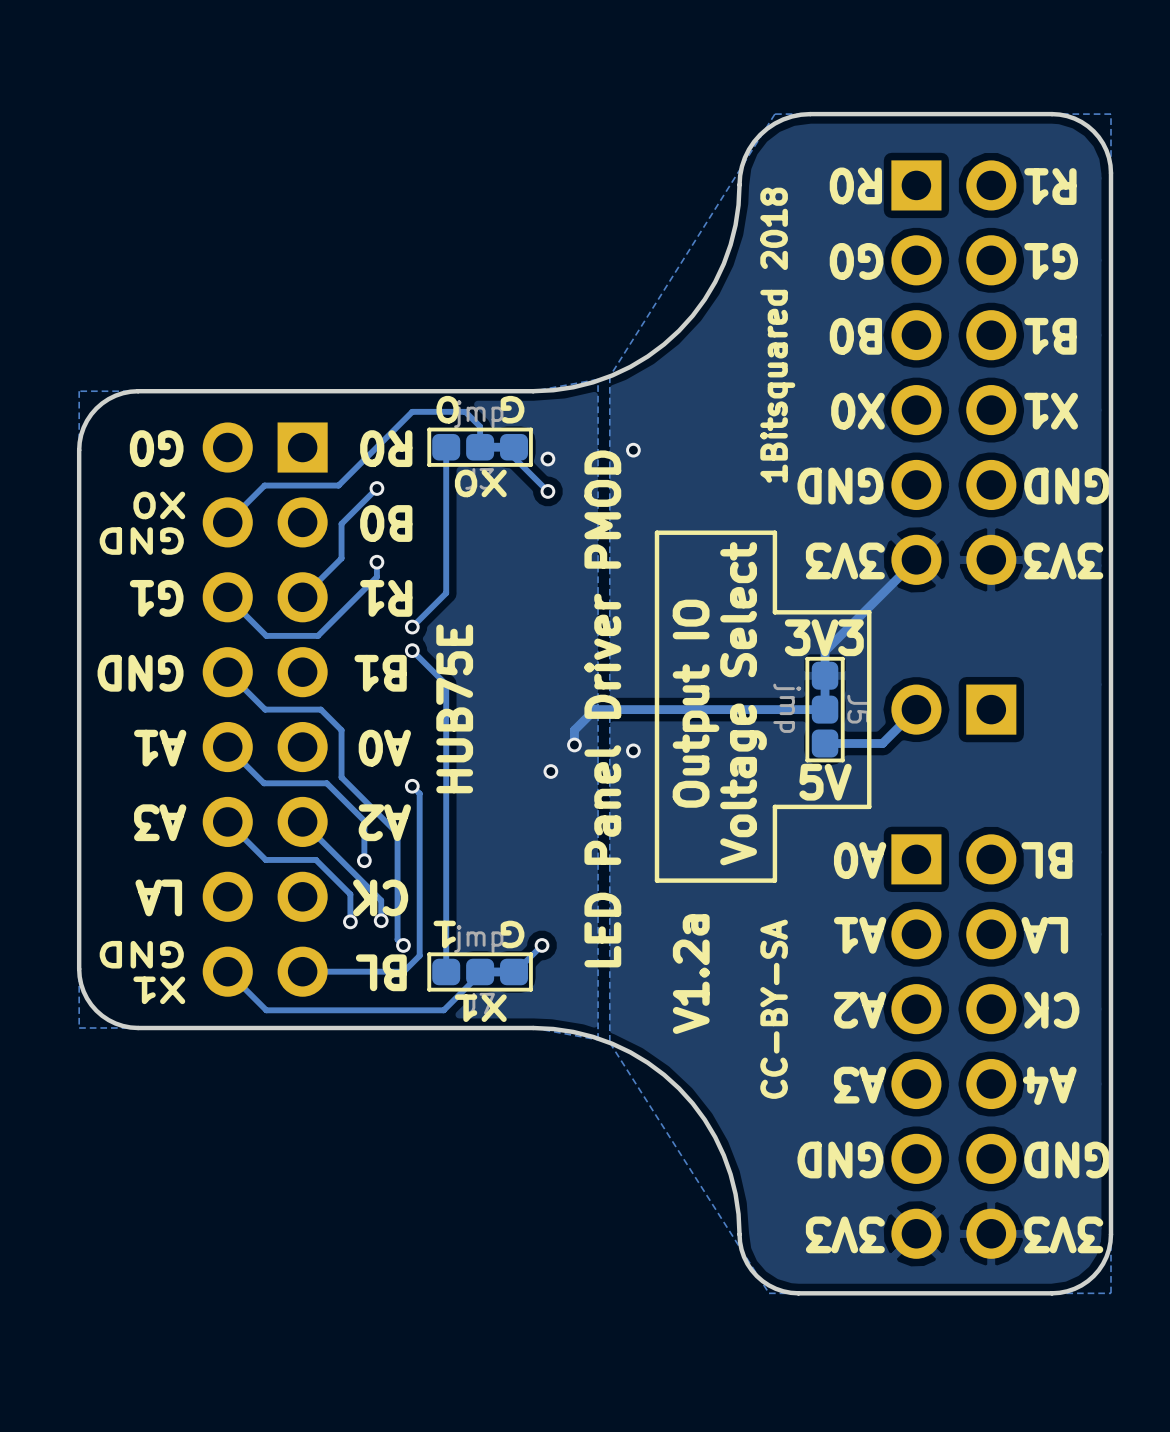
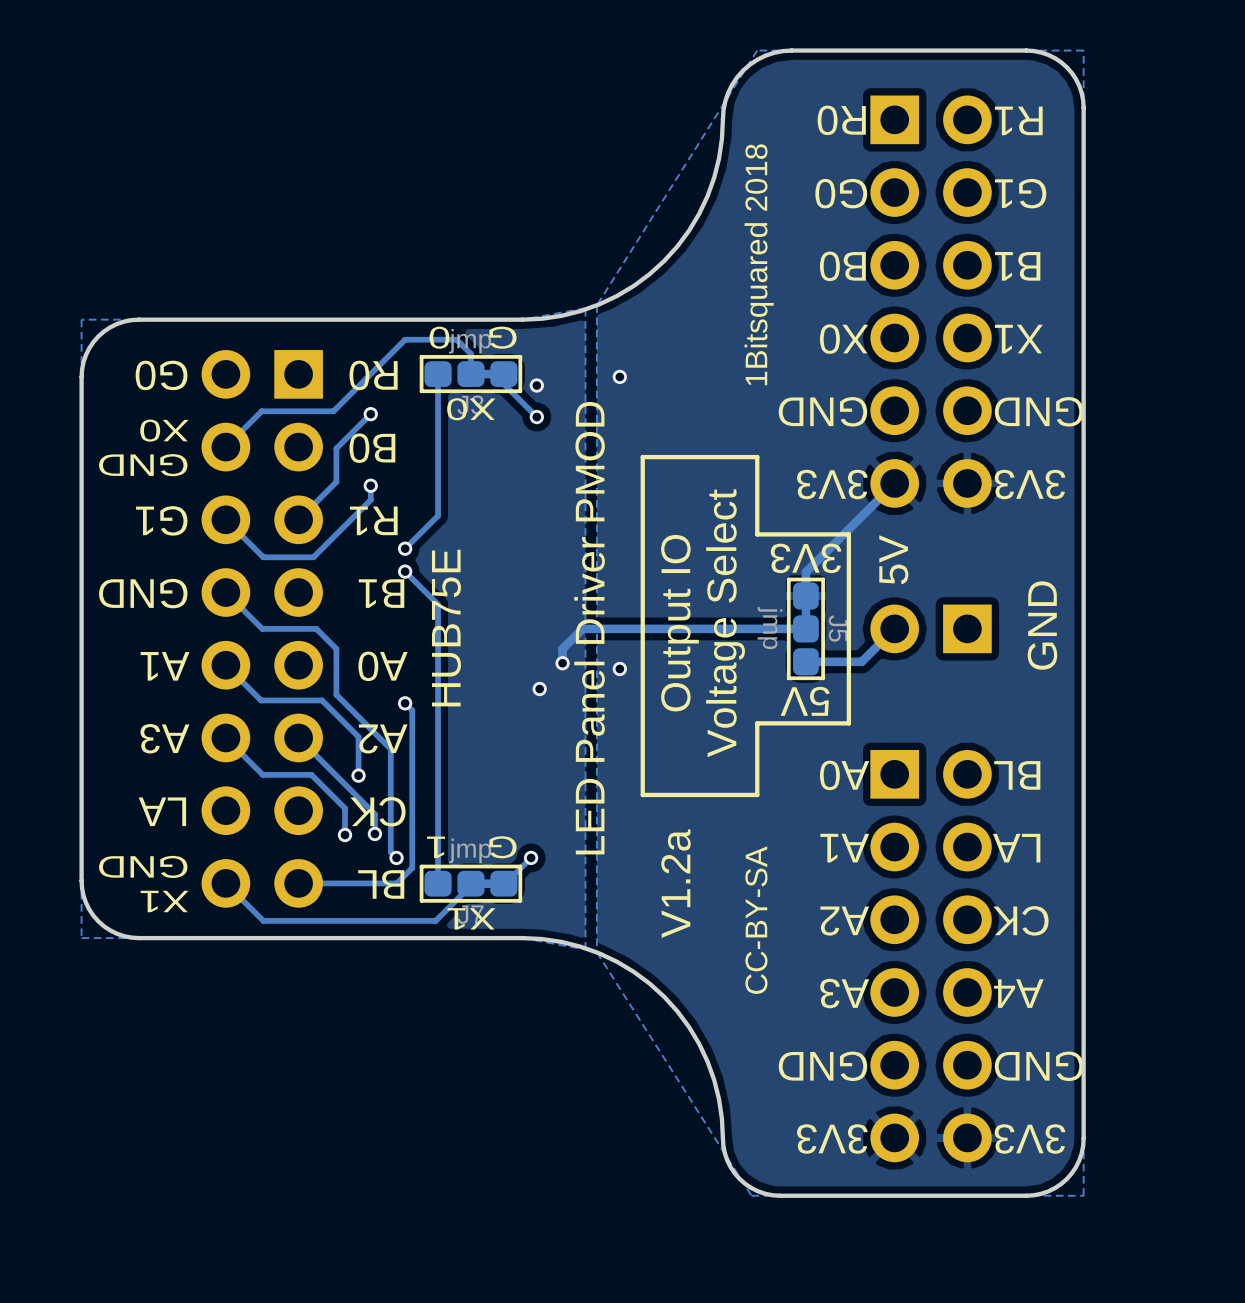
text: none -> 5V (893, 559)
text rotation: 0° (824, 637) -> 180° (806, 558)
text: none -> GND (1042, 625)
text rotation: 0° (825, 782) -> 180° (805, 701)

